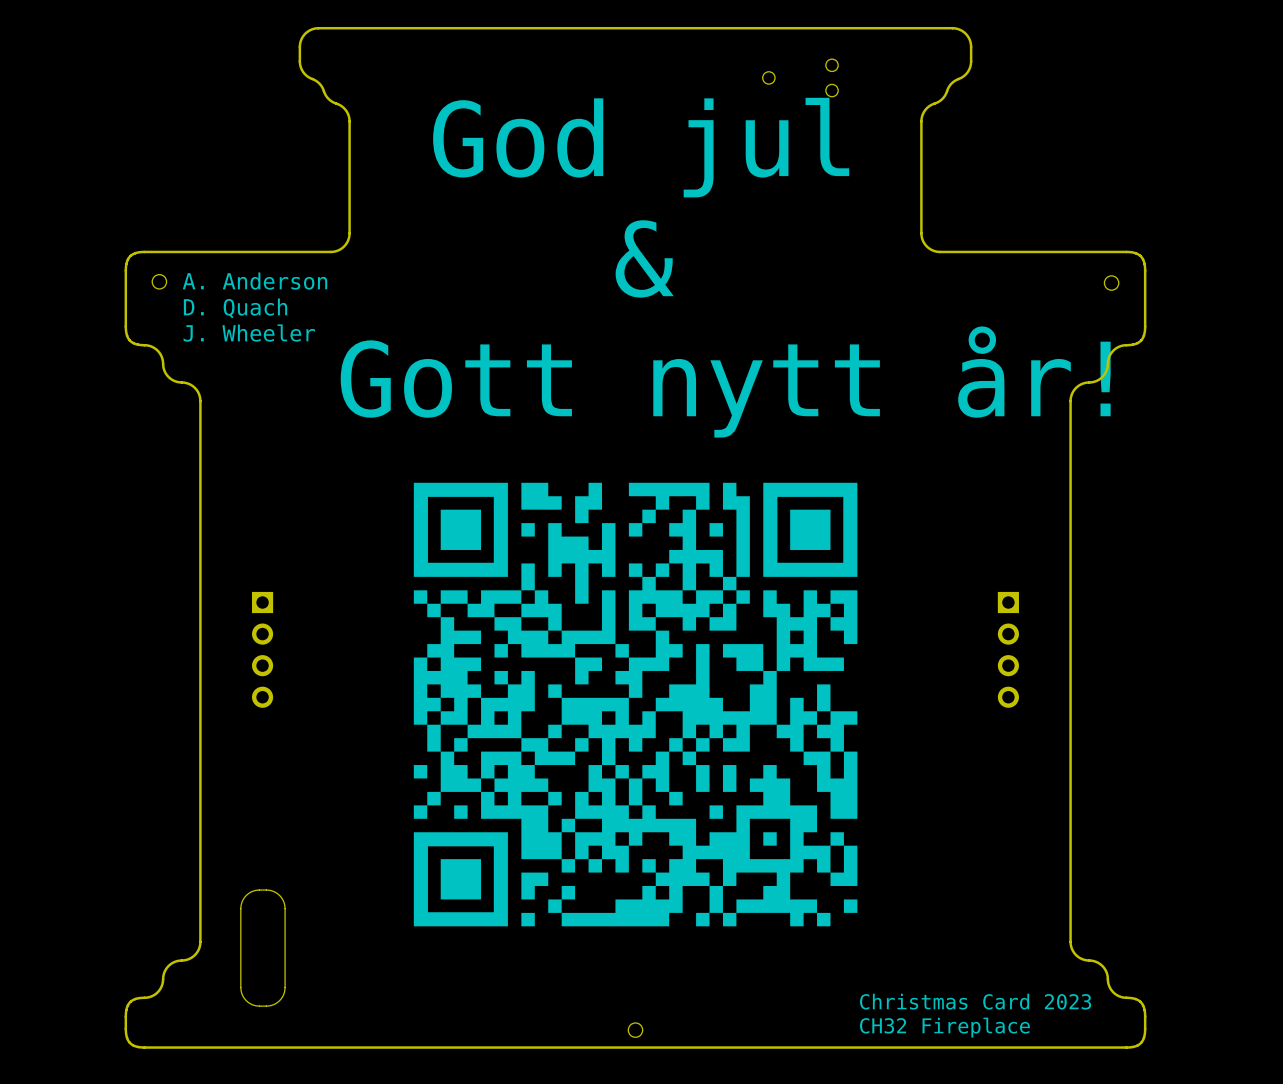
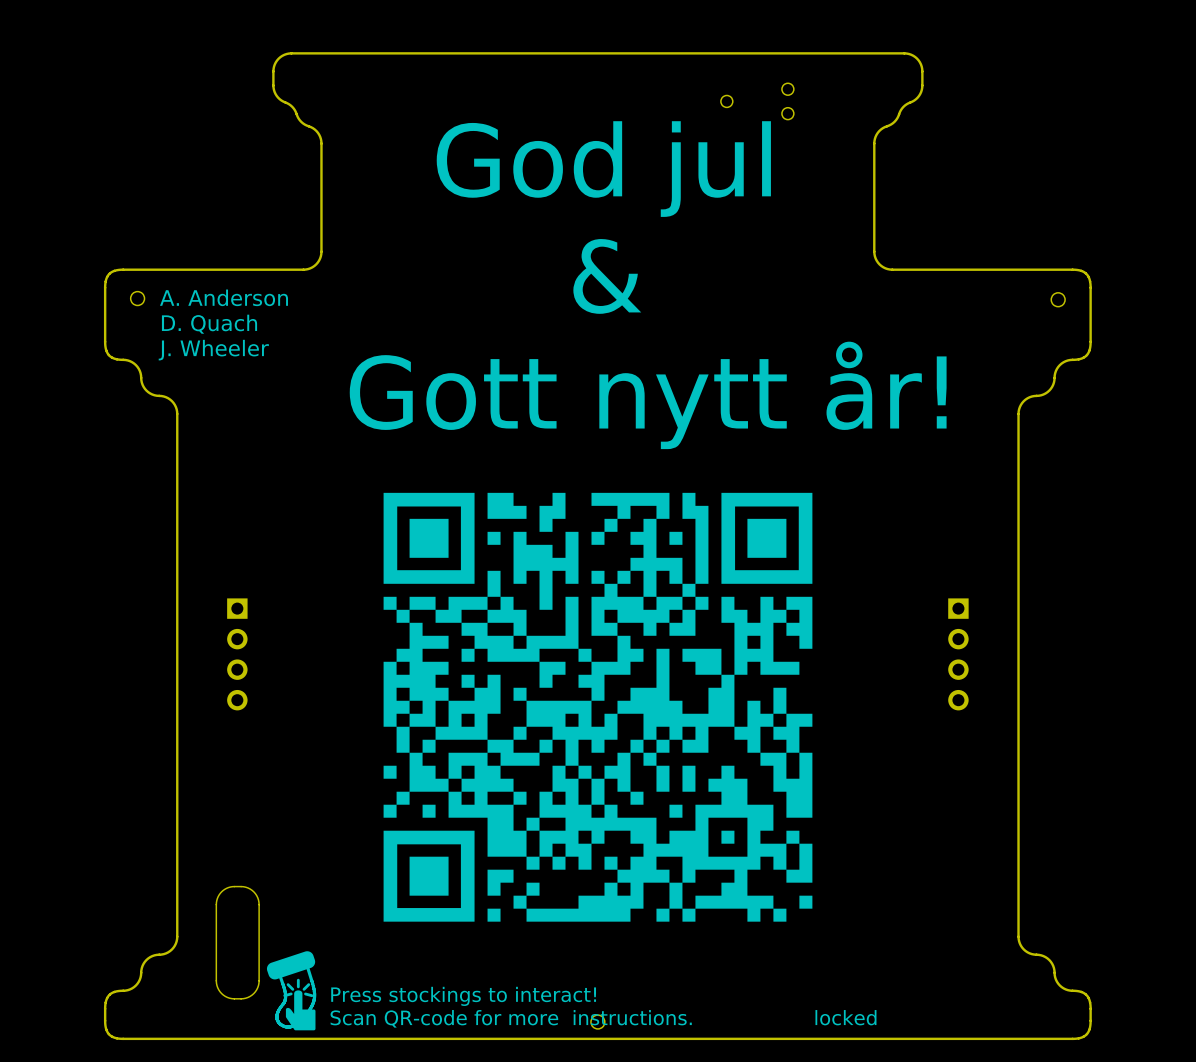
drawing: none -> [266, 951, 316, 1031]
line: none -> (307, 968) (313, 988) (313, 1001) (302, 1019) (290, 1026) (281, 1025) (277, 1018) (277, 1012) (285, 997) (280, 976)
line: none -> (298, 980) (298, 986)
line: none -> (288, 984) (292, 989)
line: none -> (308, 984) (304, 989)
line: none -> (291, 993) (284, 995)
line: none -> (305, 993) (311, 995)
text: Christmas Card 2023 (975, 1001) -> none
text: none -> Press stockings to interact! (463, 996)
text: none -> Scan QR-code for more instructions. (511, 1018)
text: CH32 Fireplace (944, 1027) -> locked (845, 1017)

